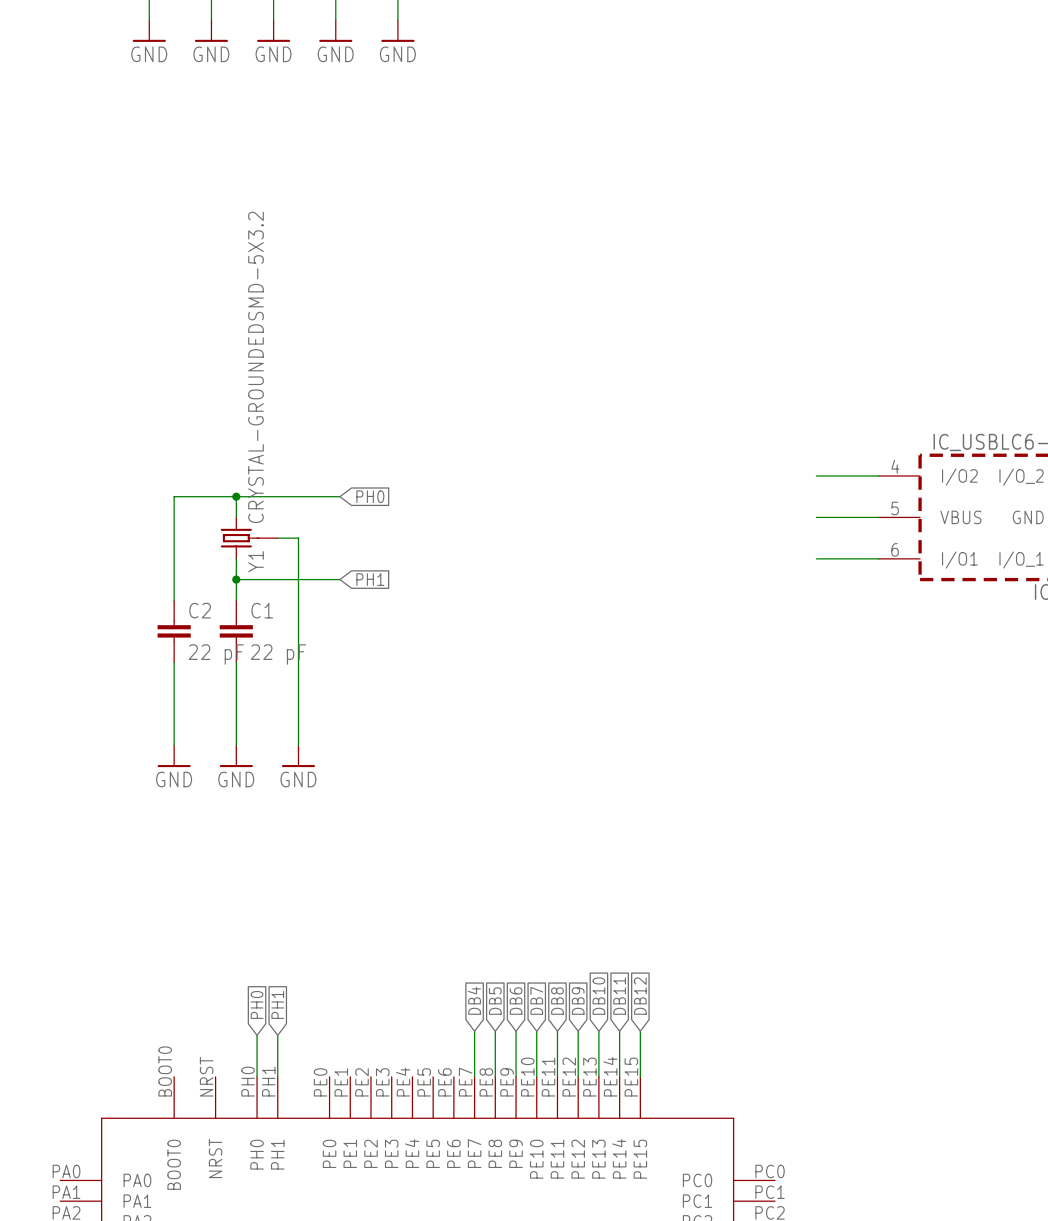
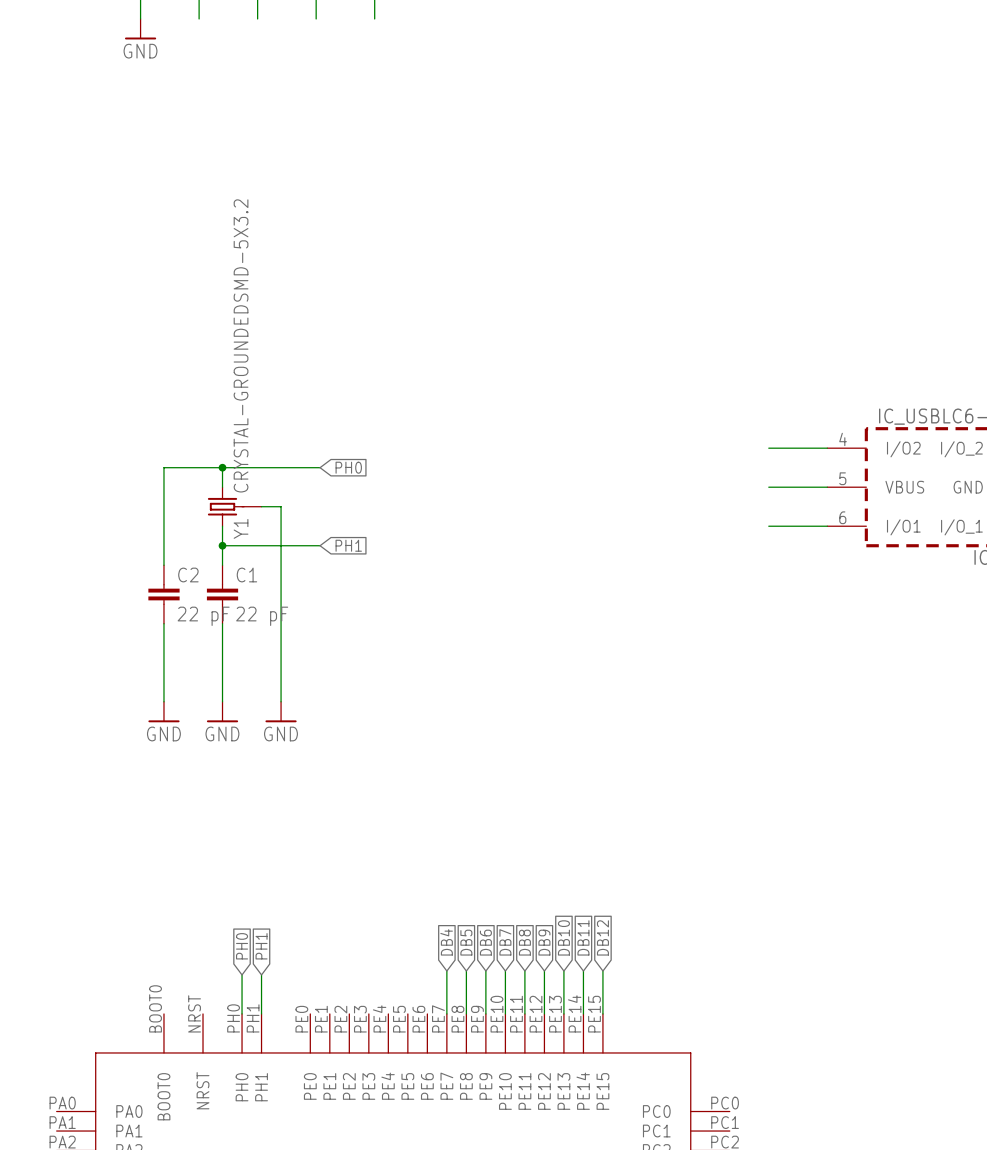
power symbol: GND (211, 31) -> none
power symbol: GND (273, 31) -> none
power symbol: GND (335, 31) -> none
power symbol: GND (397, 31) -> none

